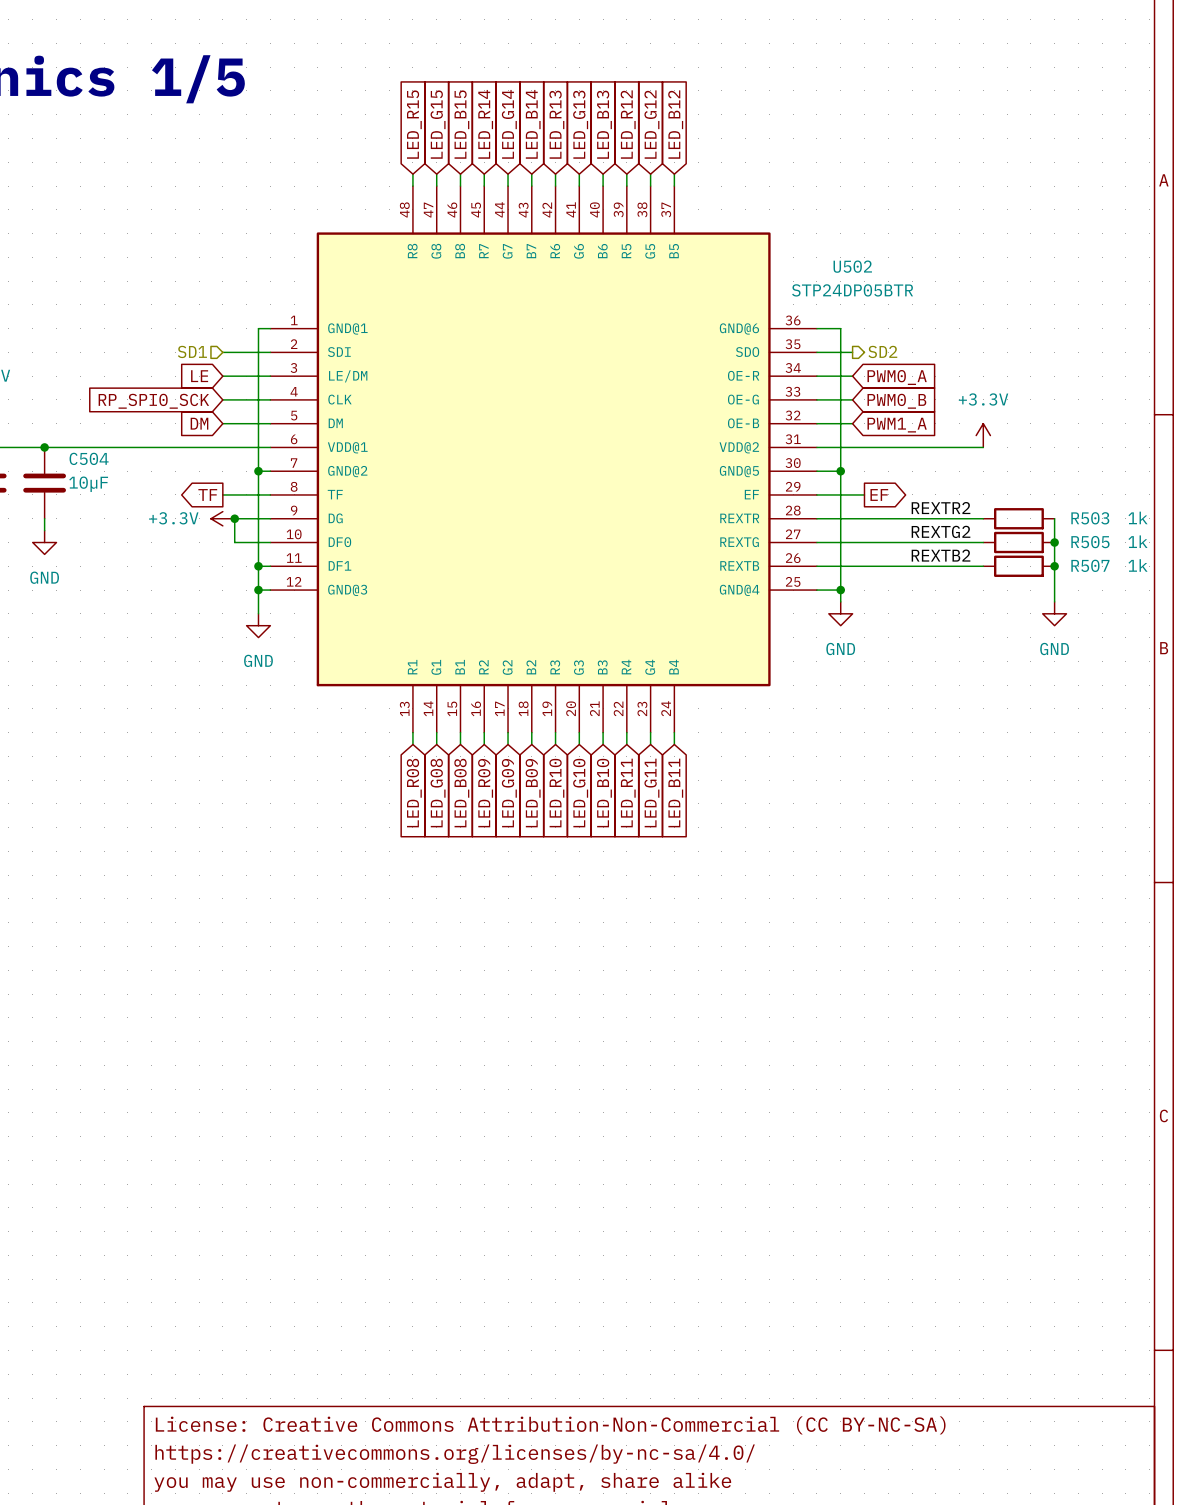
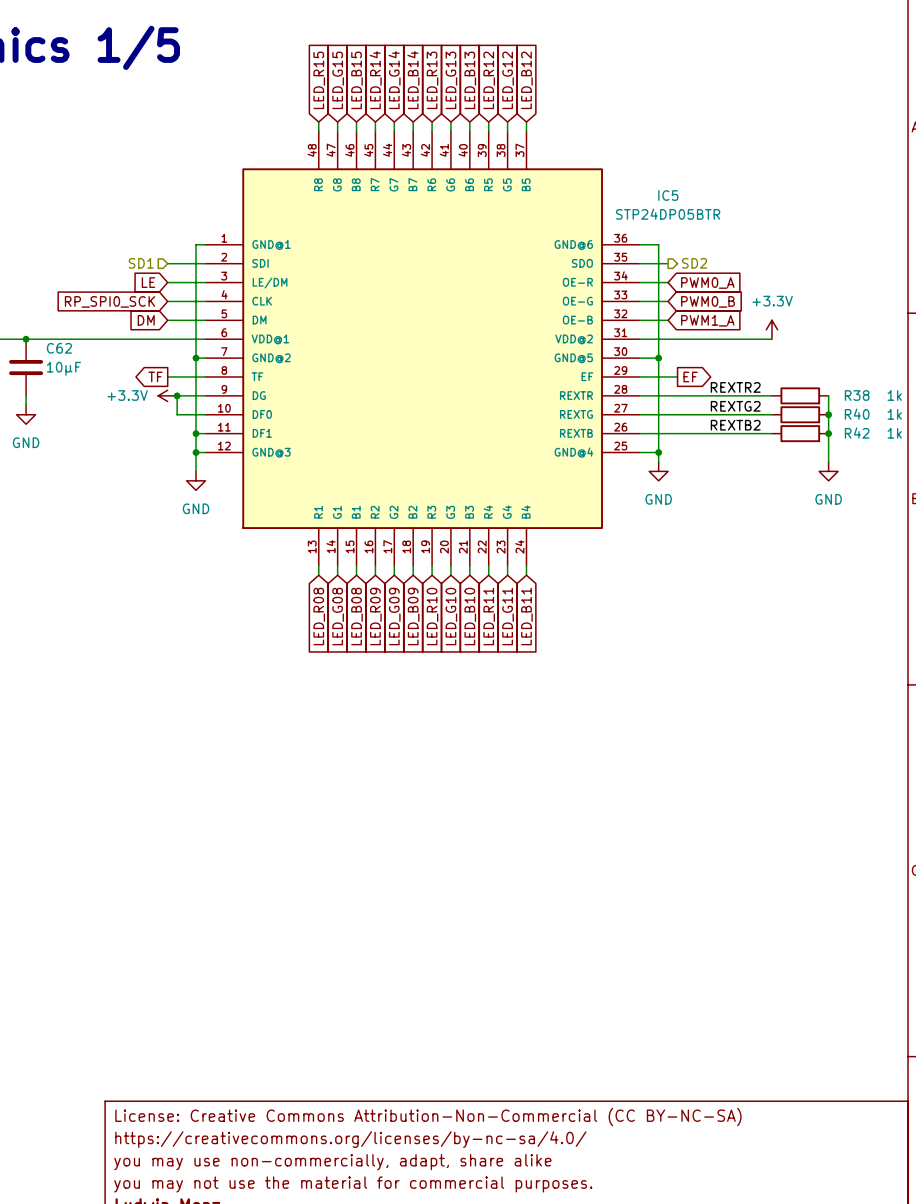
U502 name: U502 (852, 266) -> IC5 (668, 195)
C504 name: C504 (89, 458) -> C62 (59, 348)
R503 name: R503 (1090, 518) -> R38 (857, 395)
R505 name: R505 (1090, 542) -> R40 (857, 414)
R507 name: R507 (1090, 565) -> R42 (857, 433)

